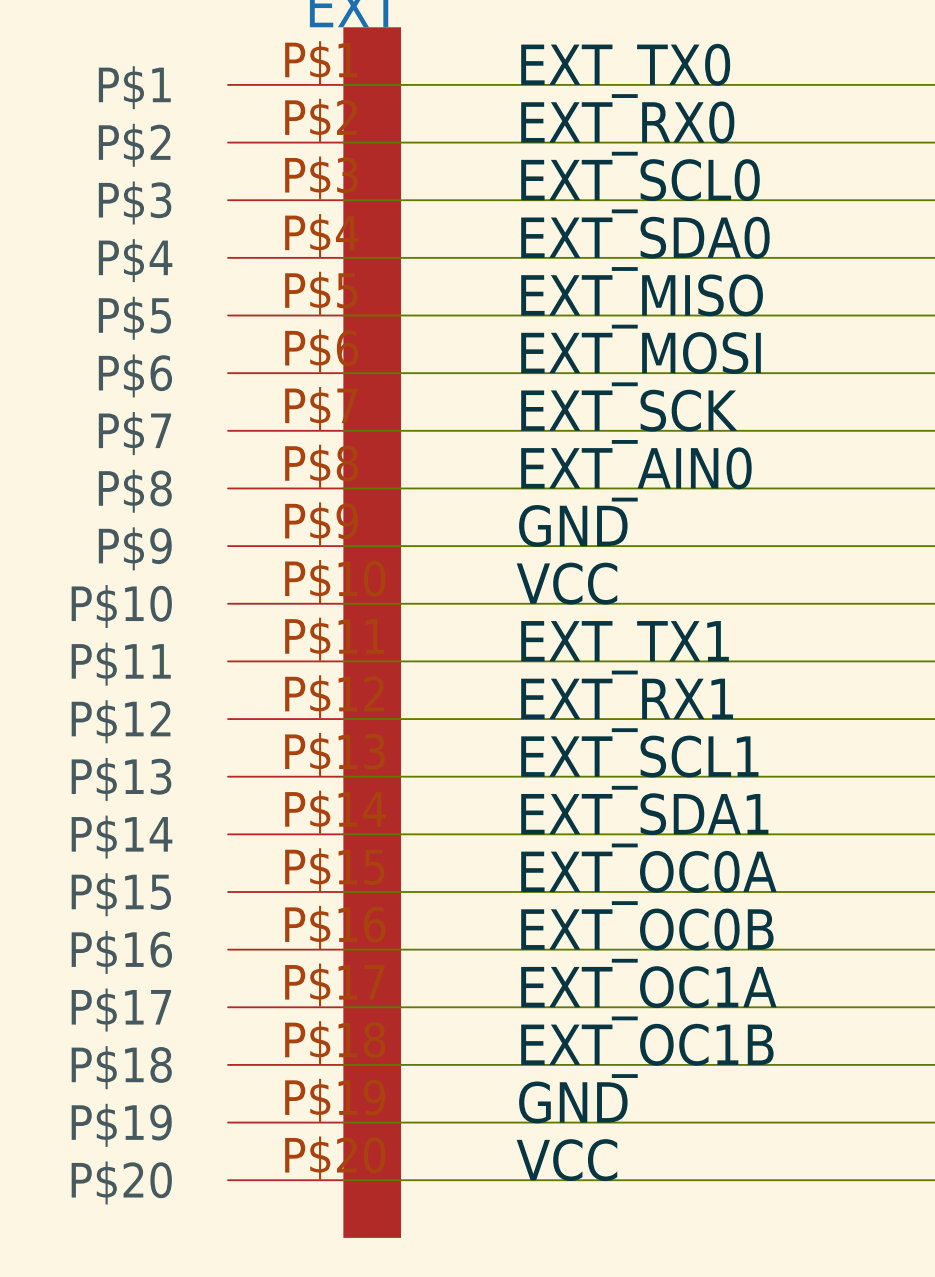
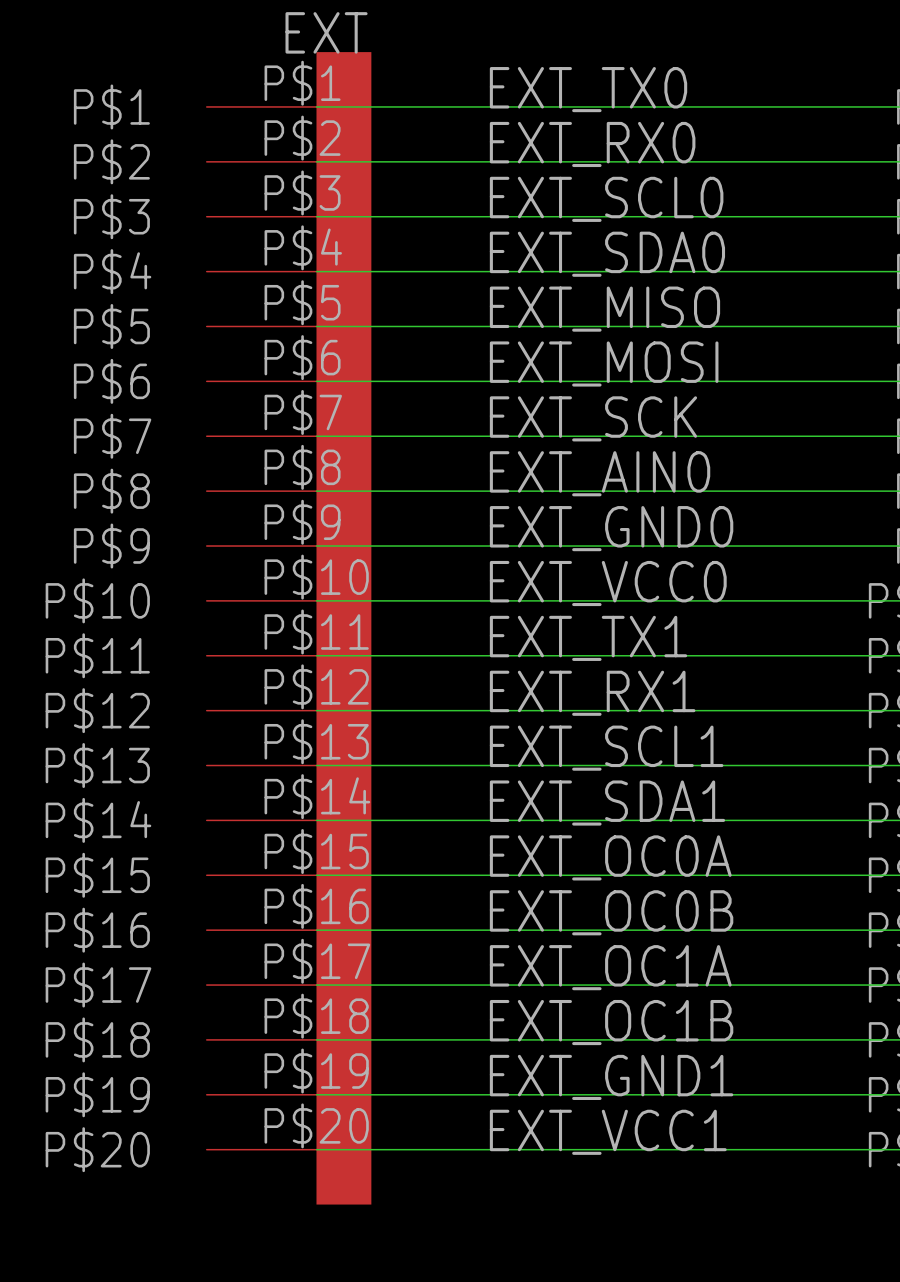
label: GND (573, 525) -> EXT_GND0 (611, 528)
label: VCC (566, 583) -> EXT_VCC0 (608, 583)
label: GND (573, 1102) -> EXT_GND1 (611, 1077)
label: VCC (566, 1160) -> EXT_VCC1 (608, 1132)

